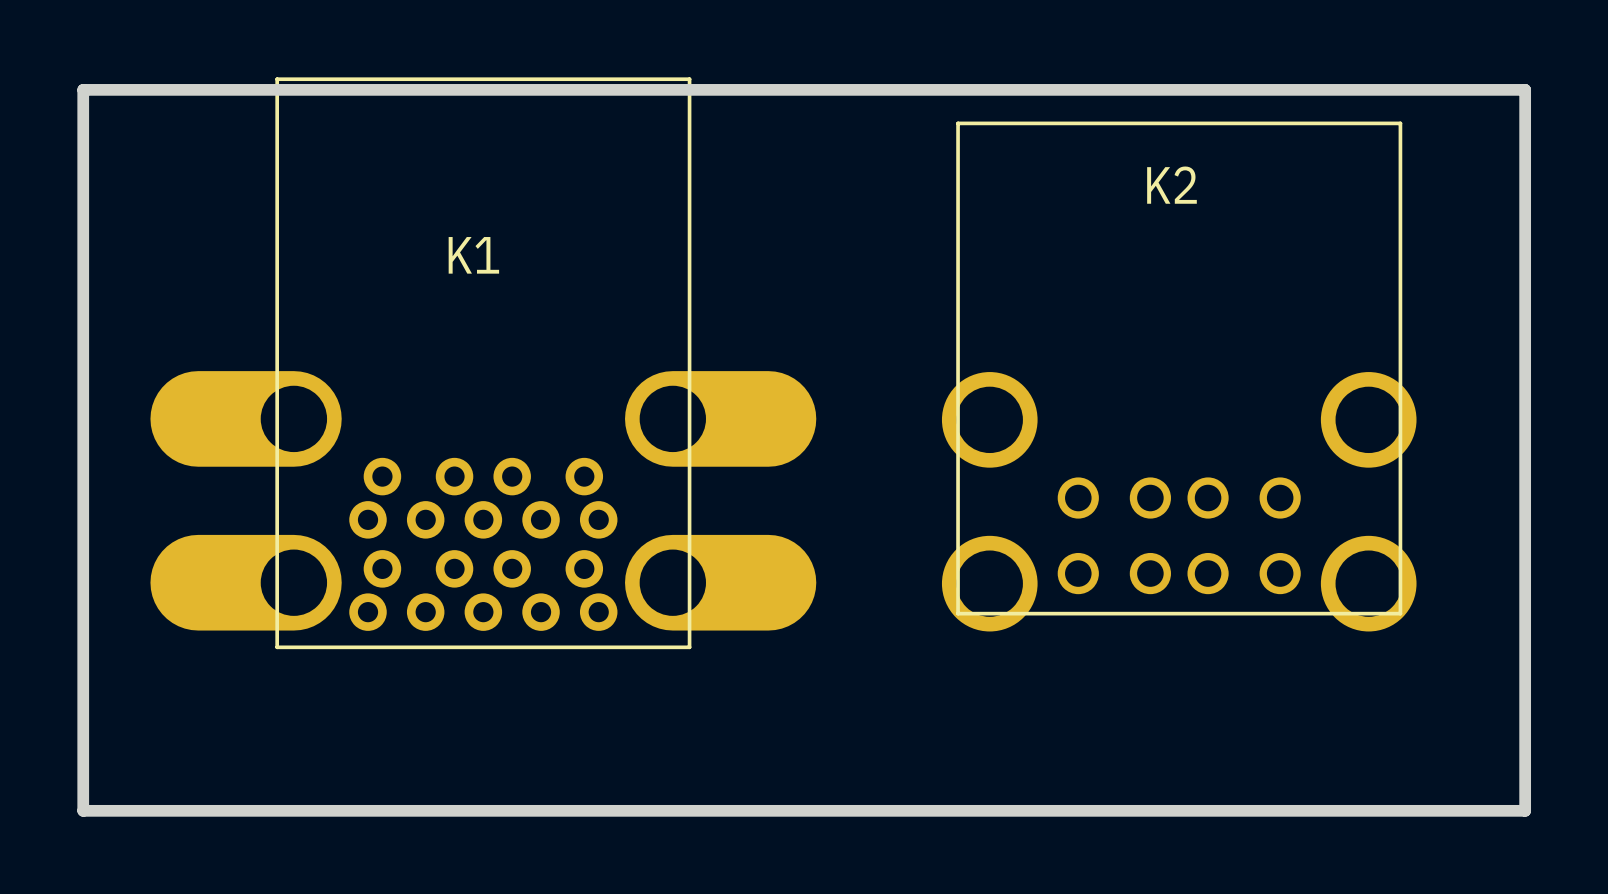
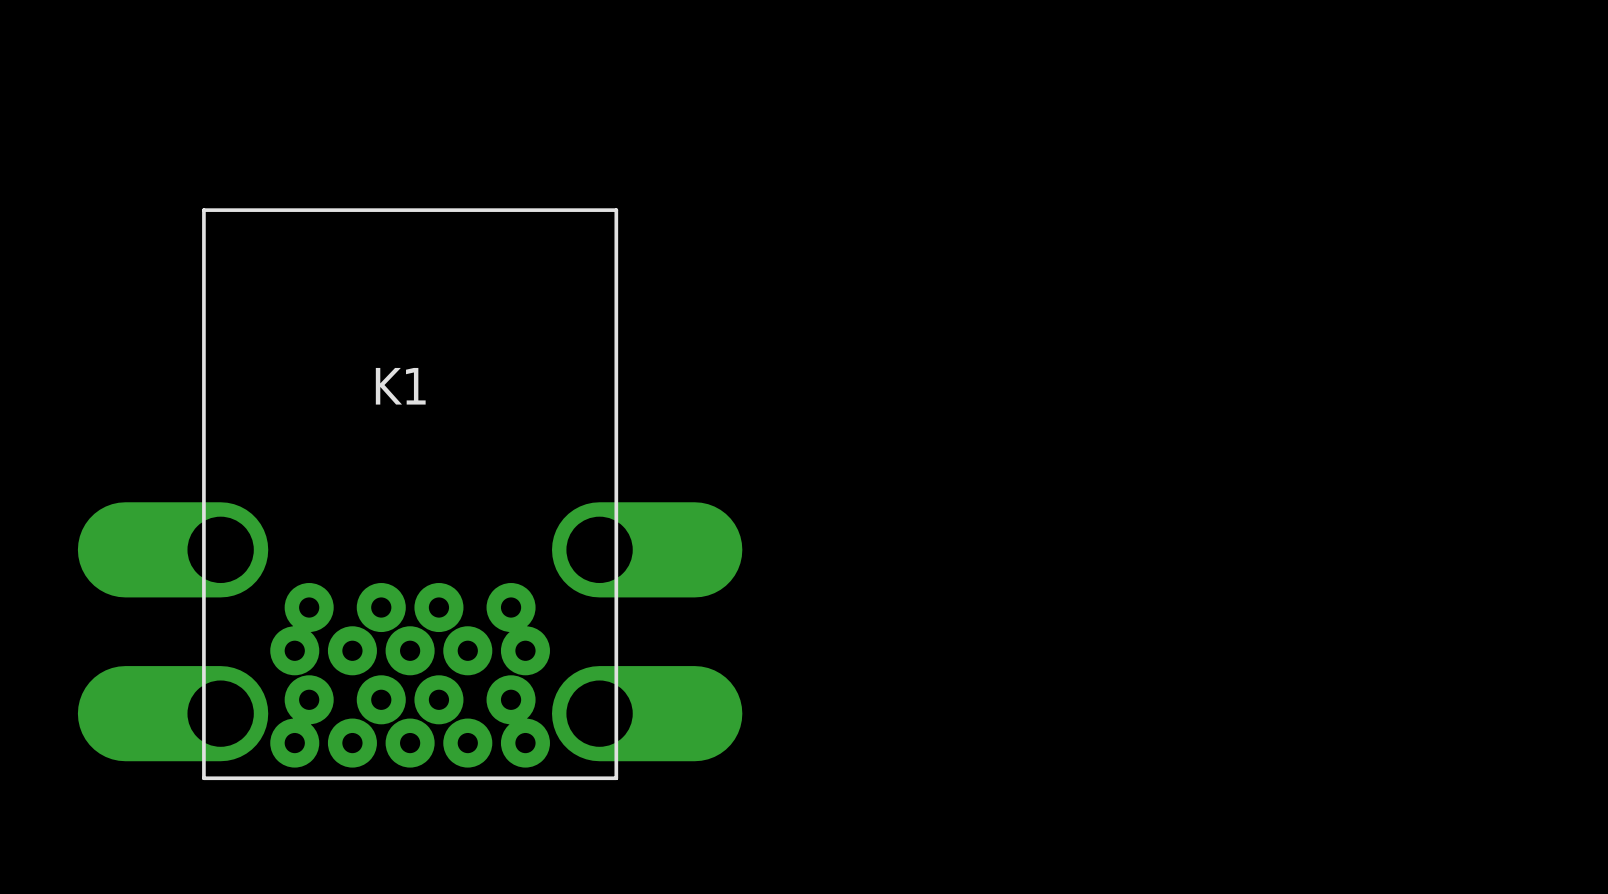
K1 footprint: [150, 77, 817, 650] -> [77, 208, 743, 781]
board edge: (83, 89) (1525, 89) (1525, 810) (83, 810) (83, 89) -> none
K2: (1179, 376) -> none

